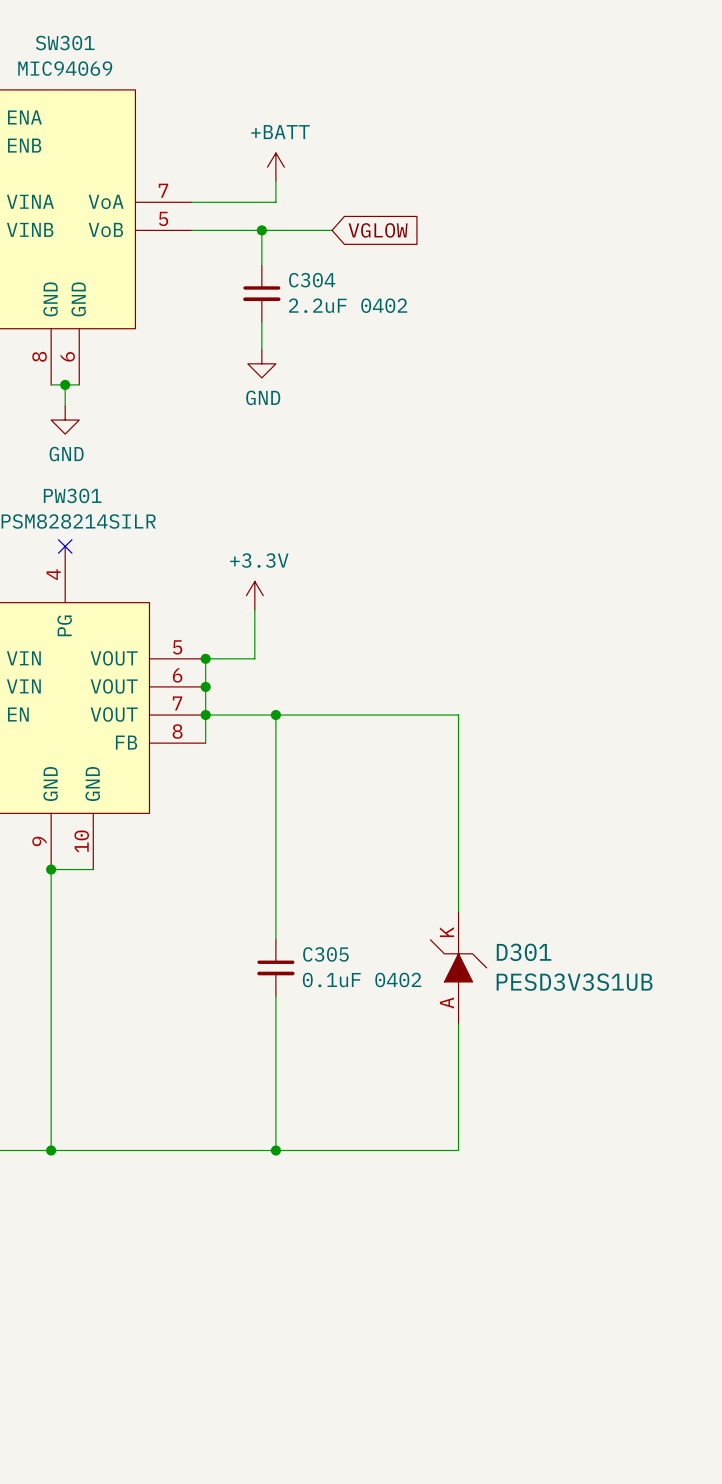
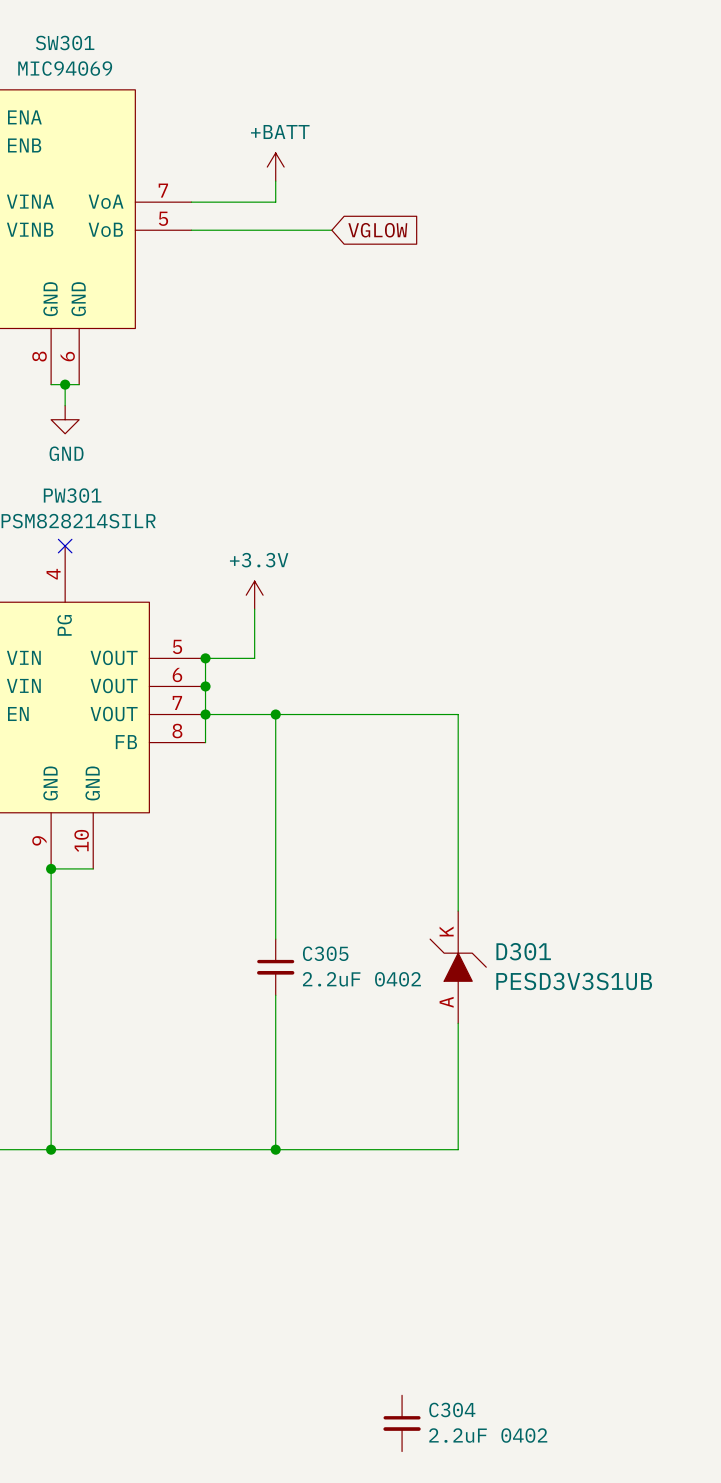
wire: (261, 230) (261, 265) -> none
junction: (261, 230) -> none
C304 position: (261, 293) -> (402, 1423)
wire: (261, 321) (261, 349) -> none
power symbol: GND (261, 363) -> none
C305 value: 0.1uF 0402 (362, 980) -> 2.2uF 0402 (361, 979)

